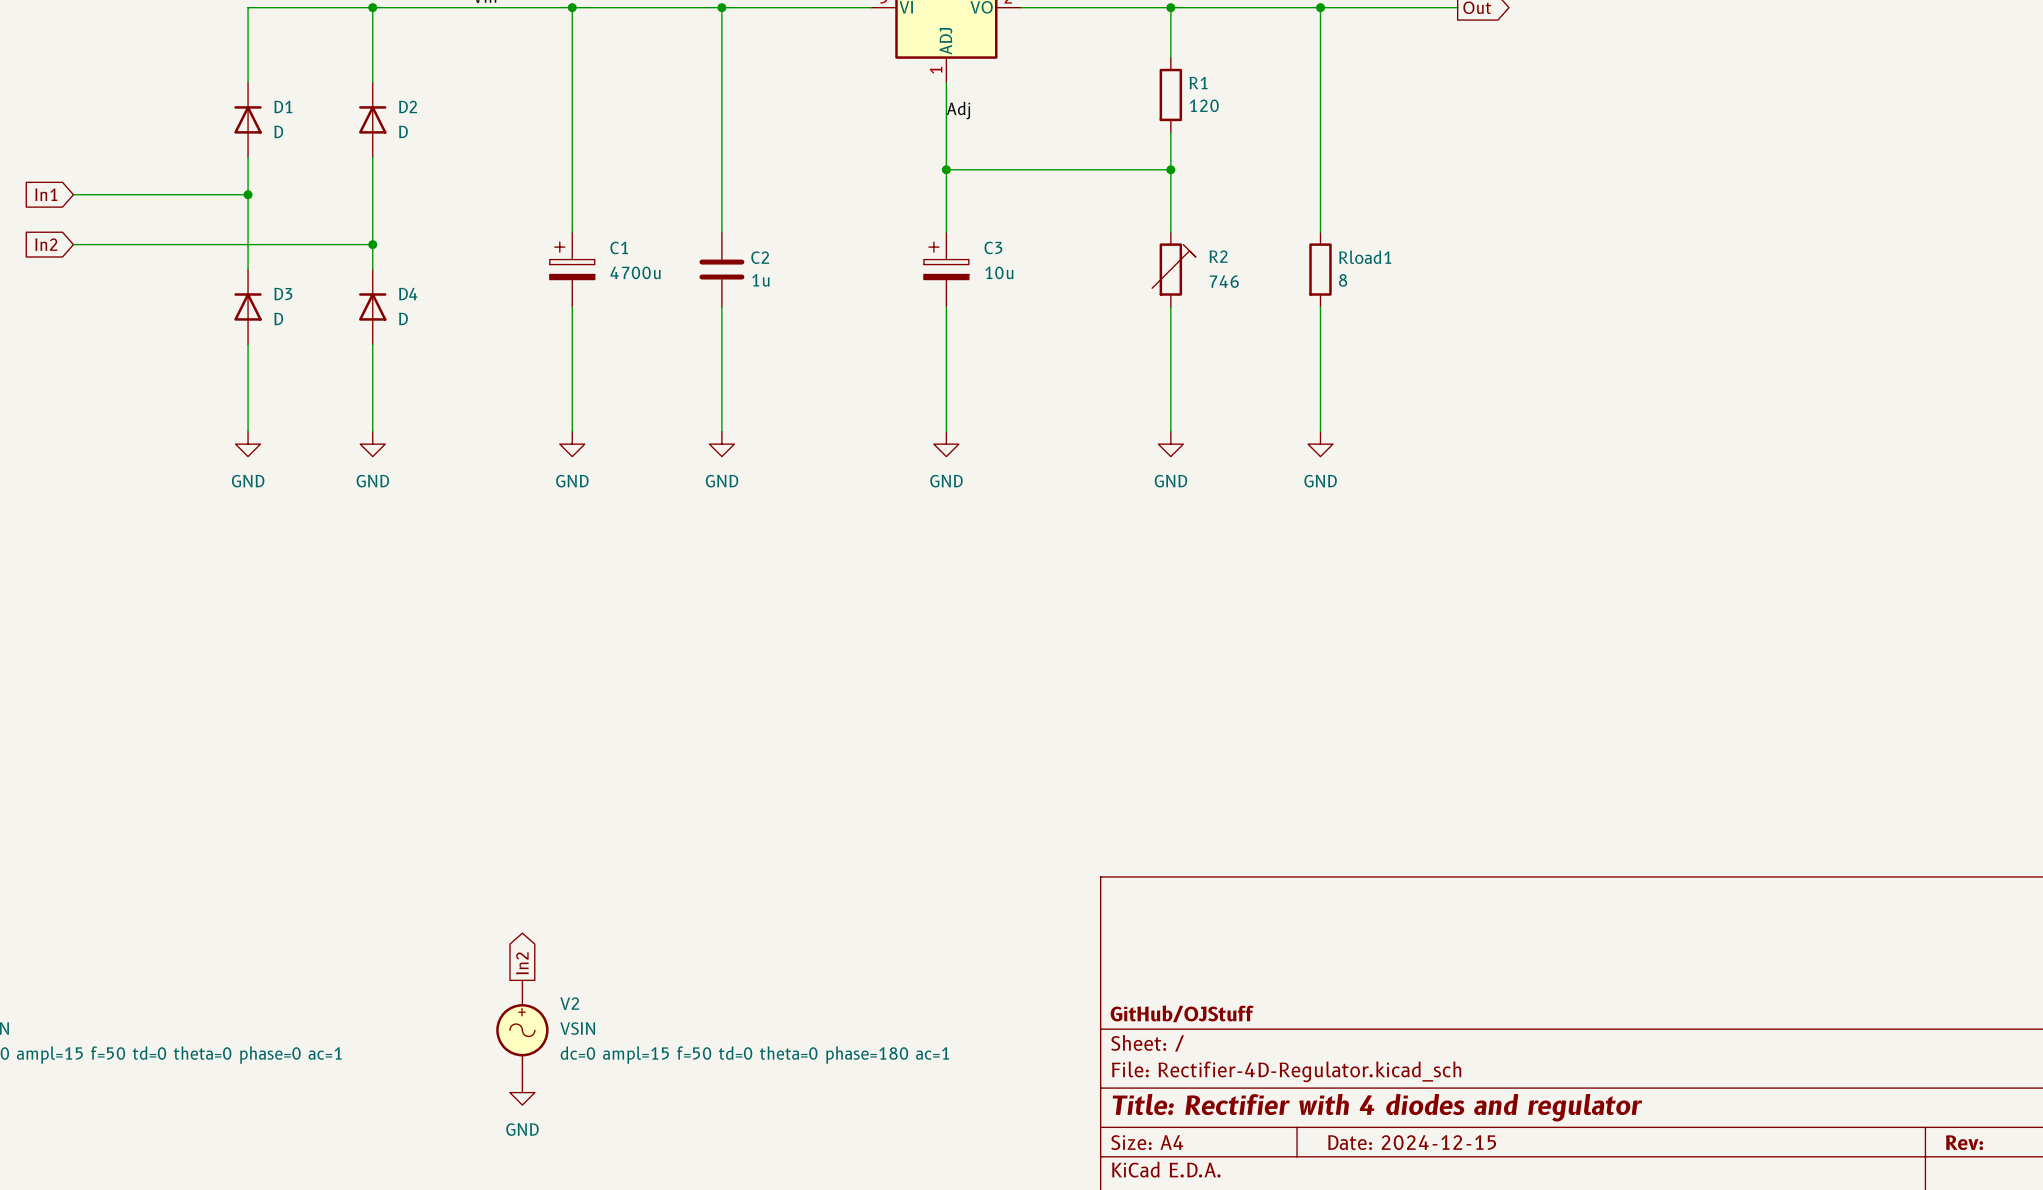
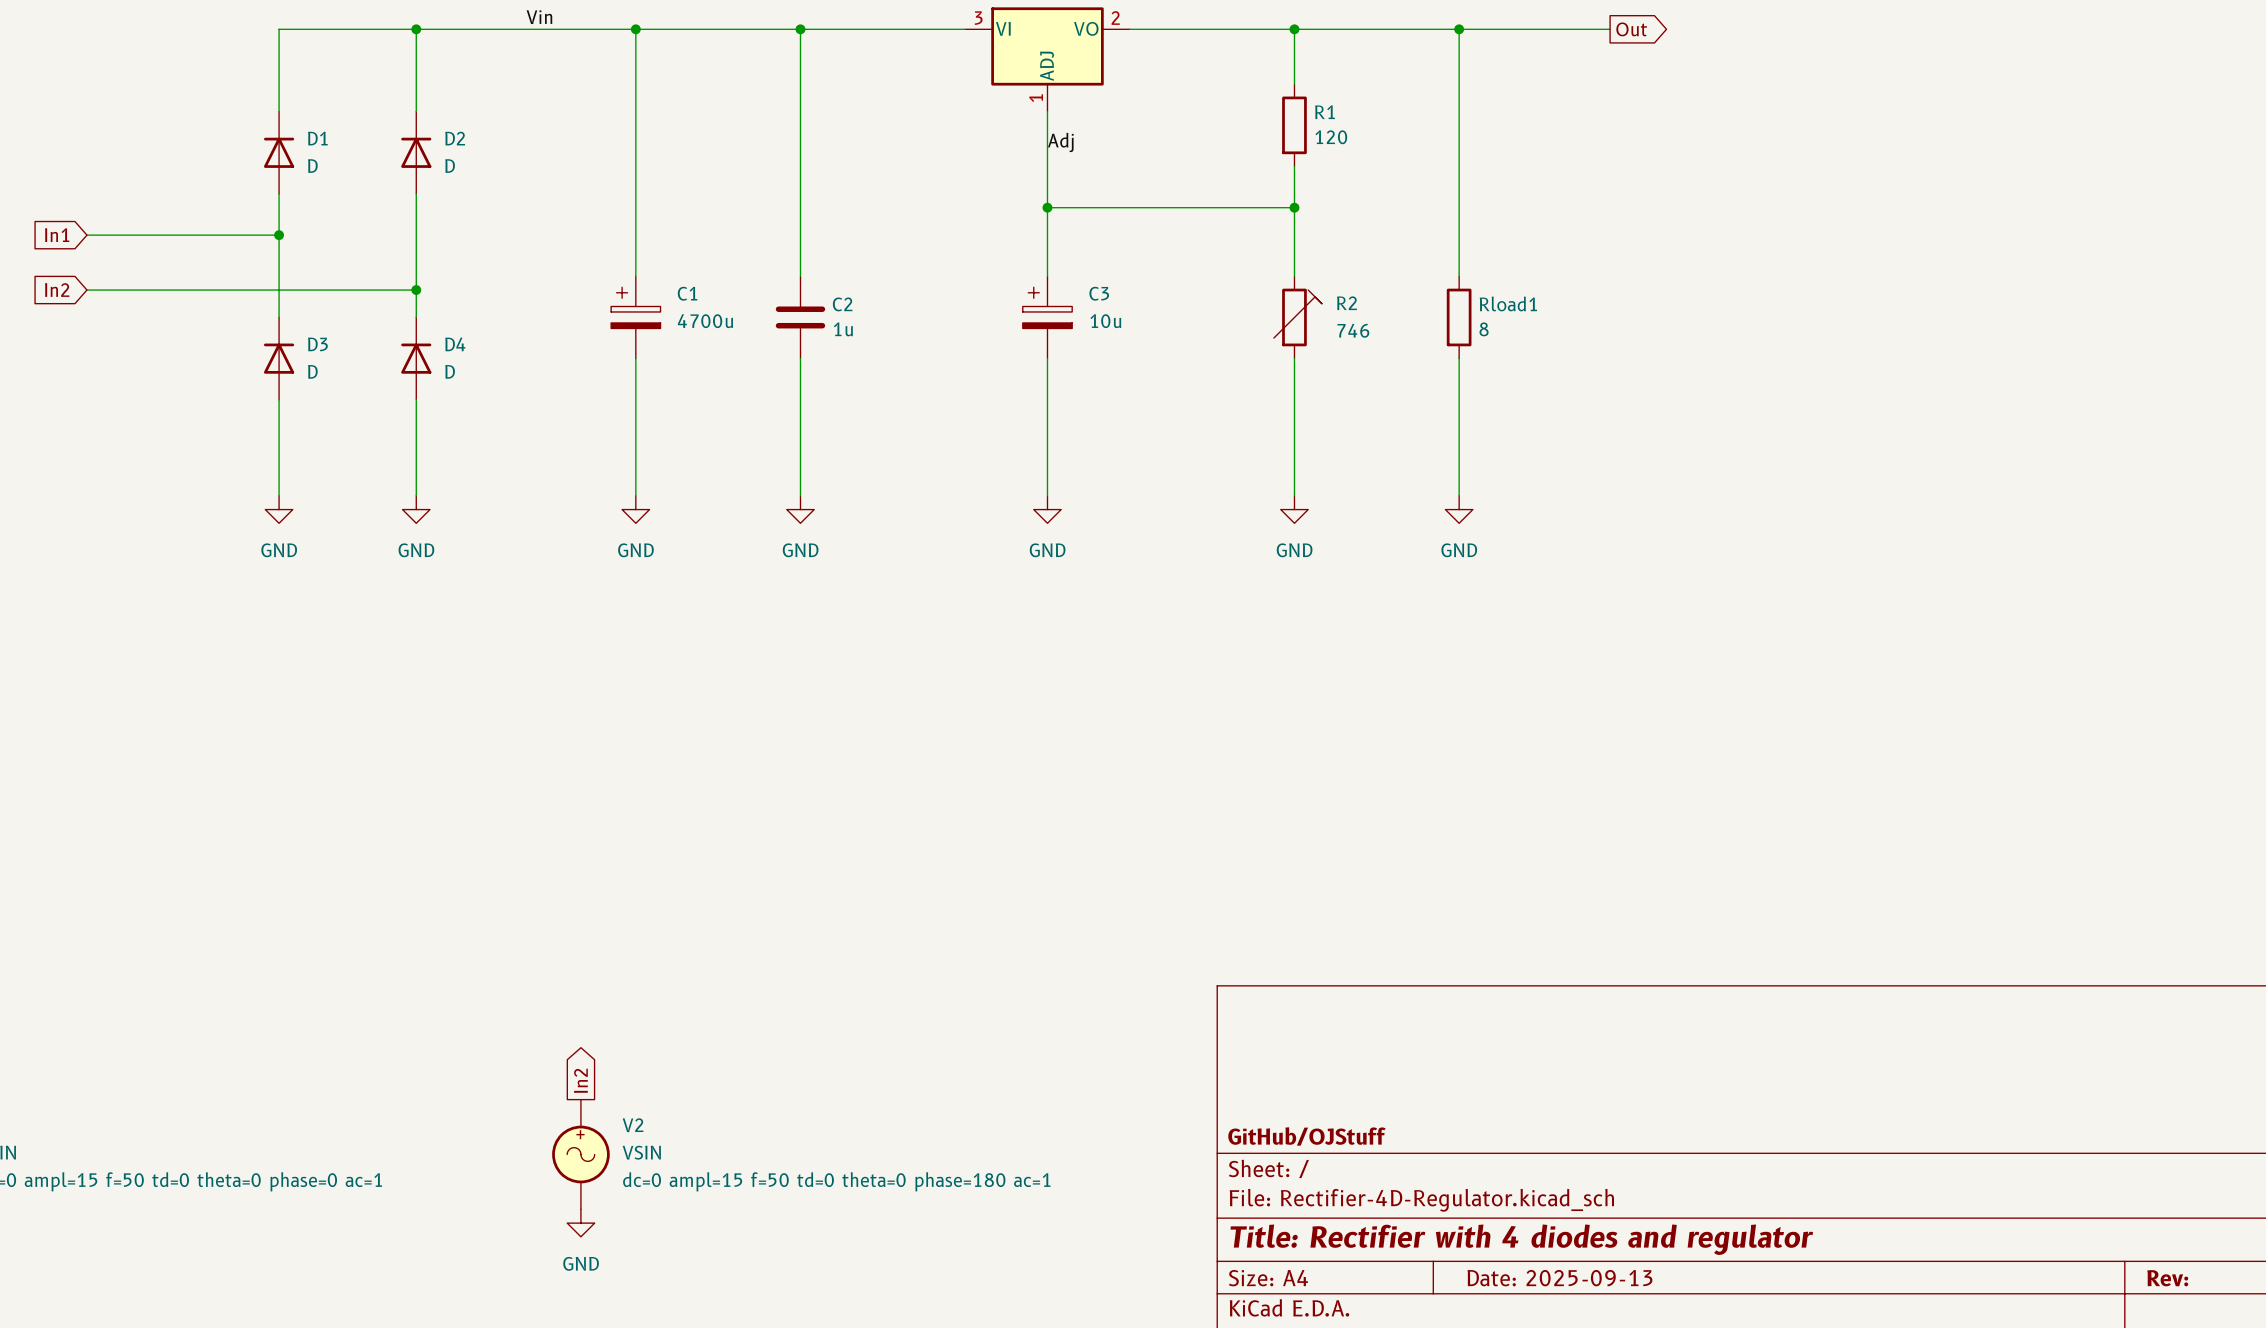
title block: Date: 2024-12-15 (1412, 1142) -> Date: 2025-09-13 (1559, 1278)

